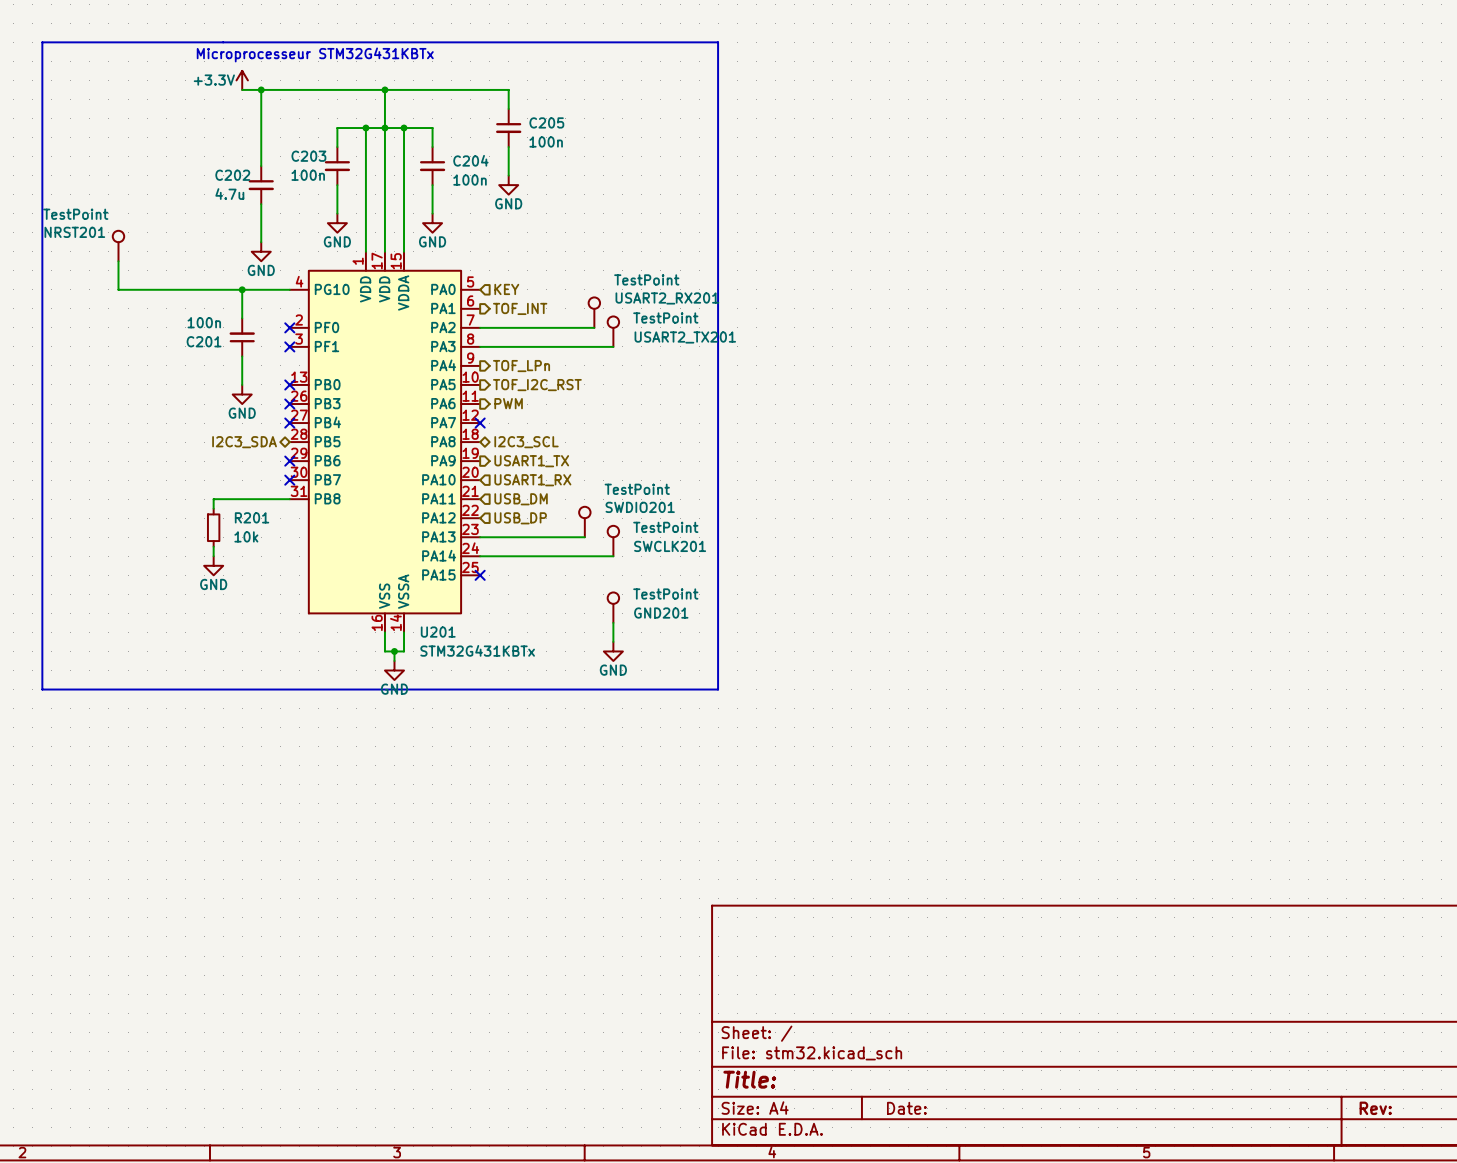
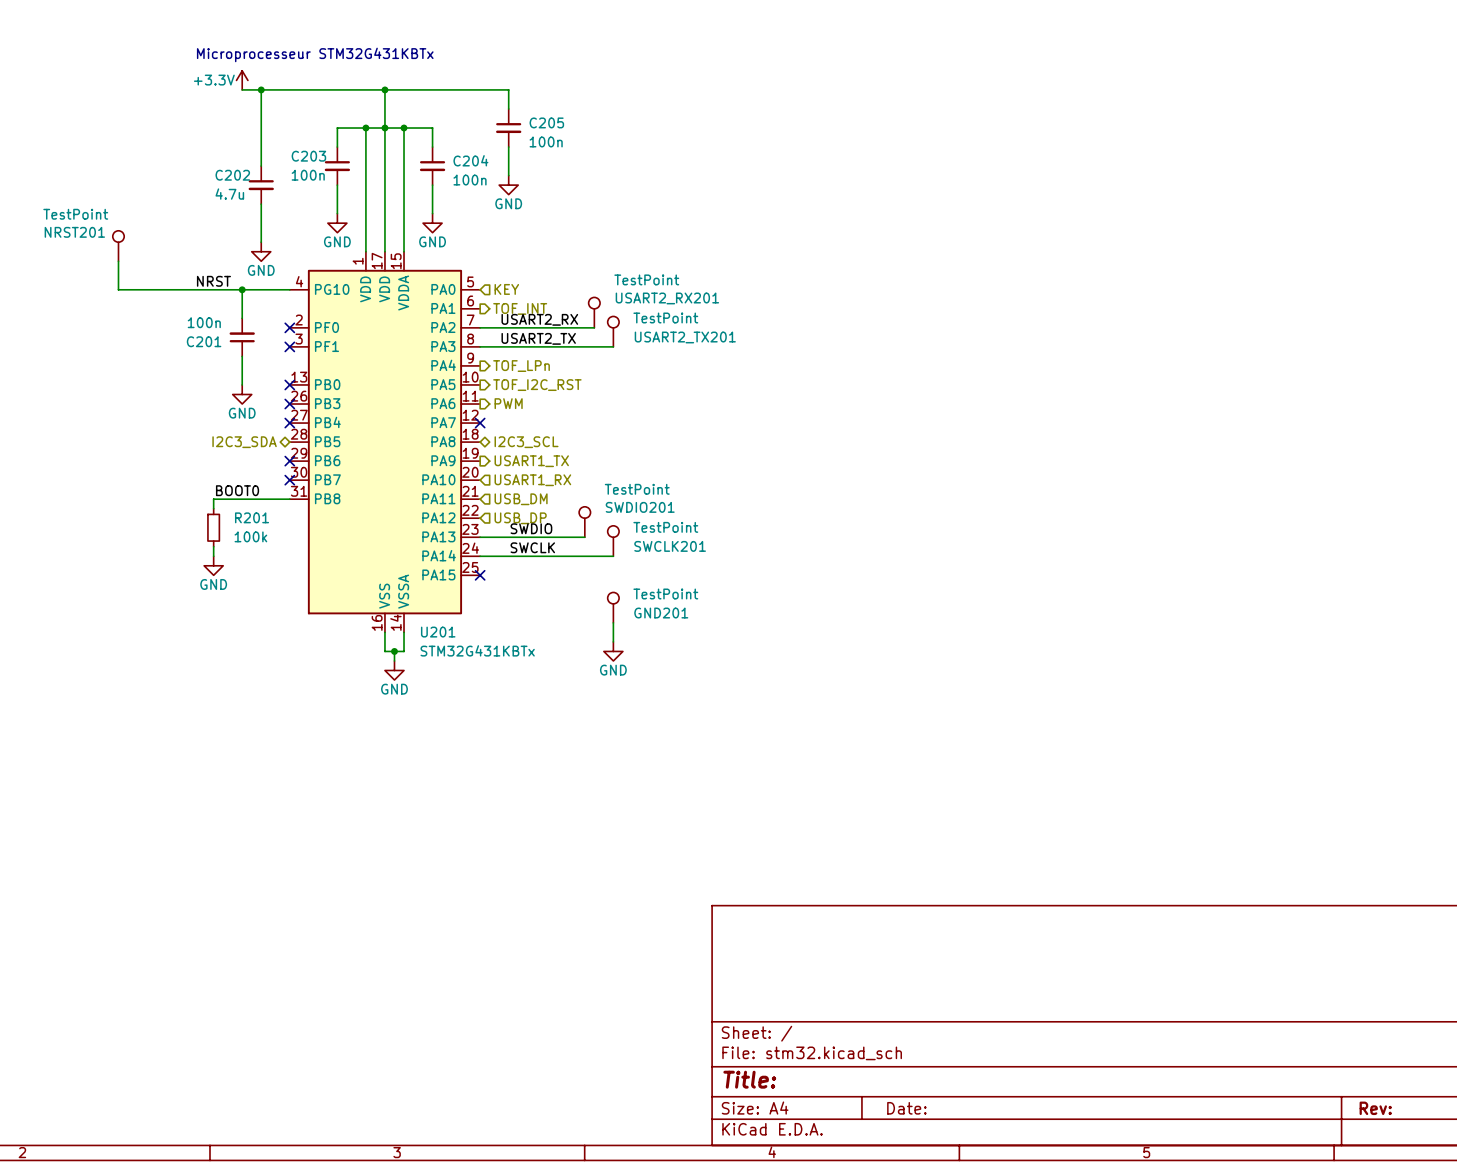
line: (42, 42) (718, 42) (718, 689) (42, 689) (42, 42) -> none
label: none -> NRST (213, 281)
label: none -> USART2_RX (539, 319)
label: none -> USART2_TX (538, 338)
label: none -> BOOT0 (237, 490)
label: none -> SWDIO (531, 528)
R201 value: 10k (246, 536) -> 100k (250, 536)
label: none -> SWCLK (532, 547)

